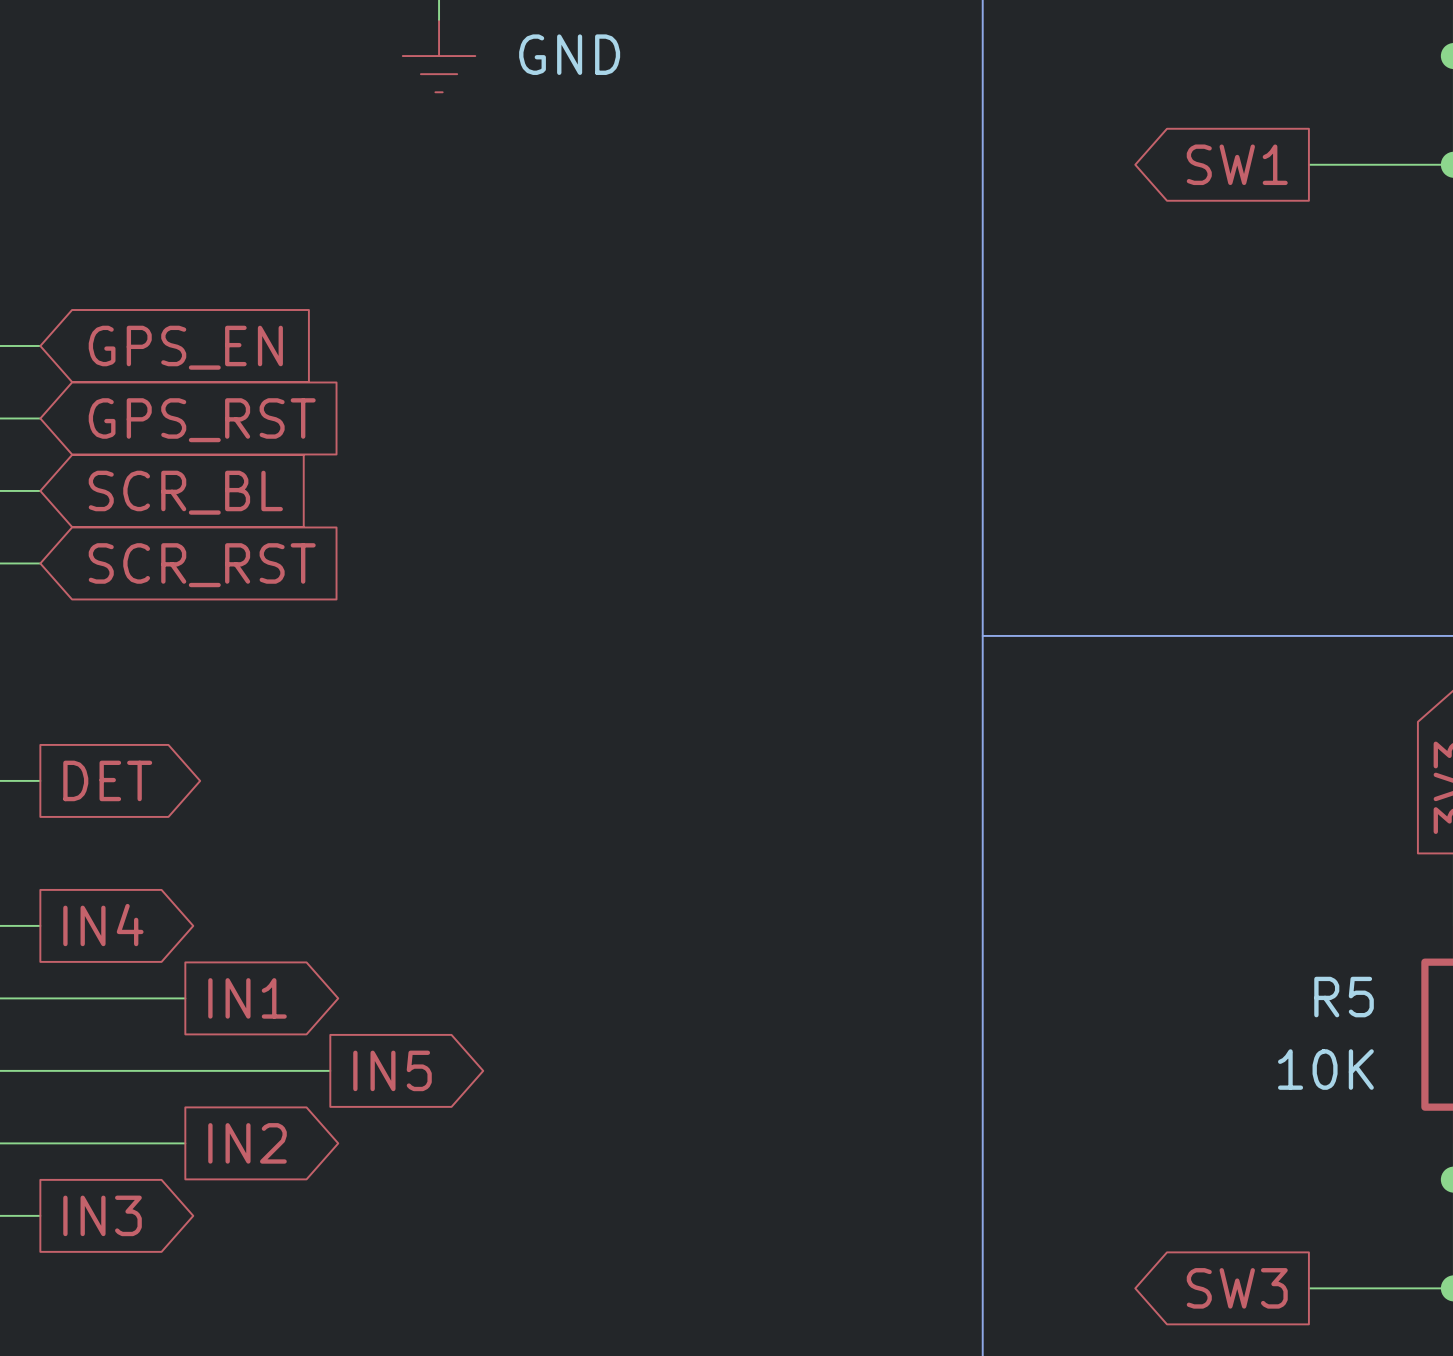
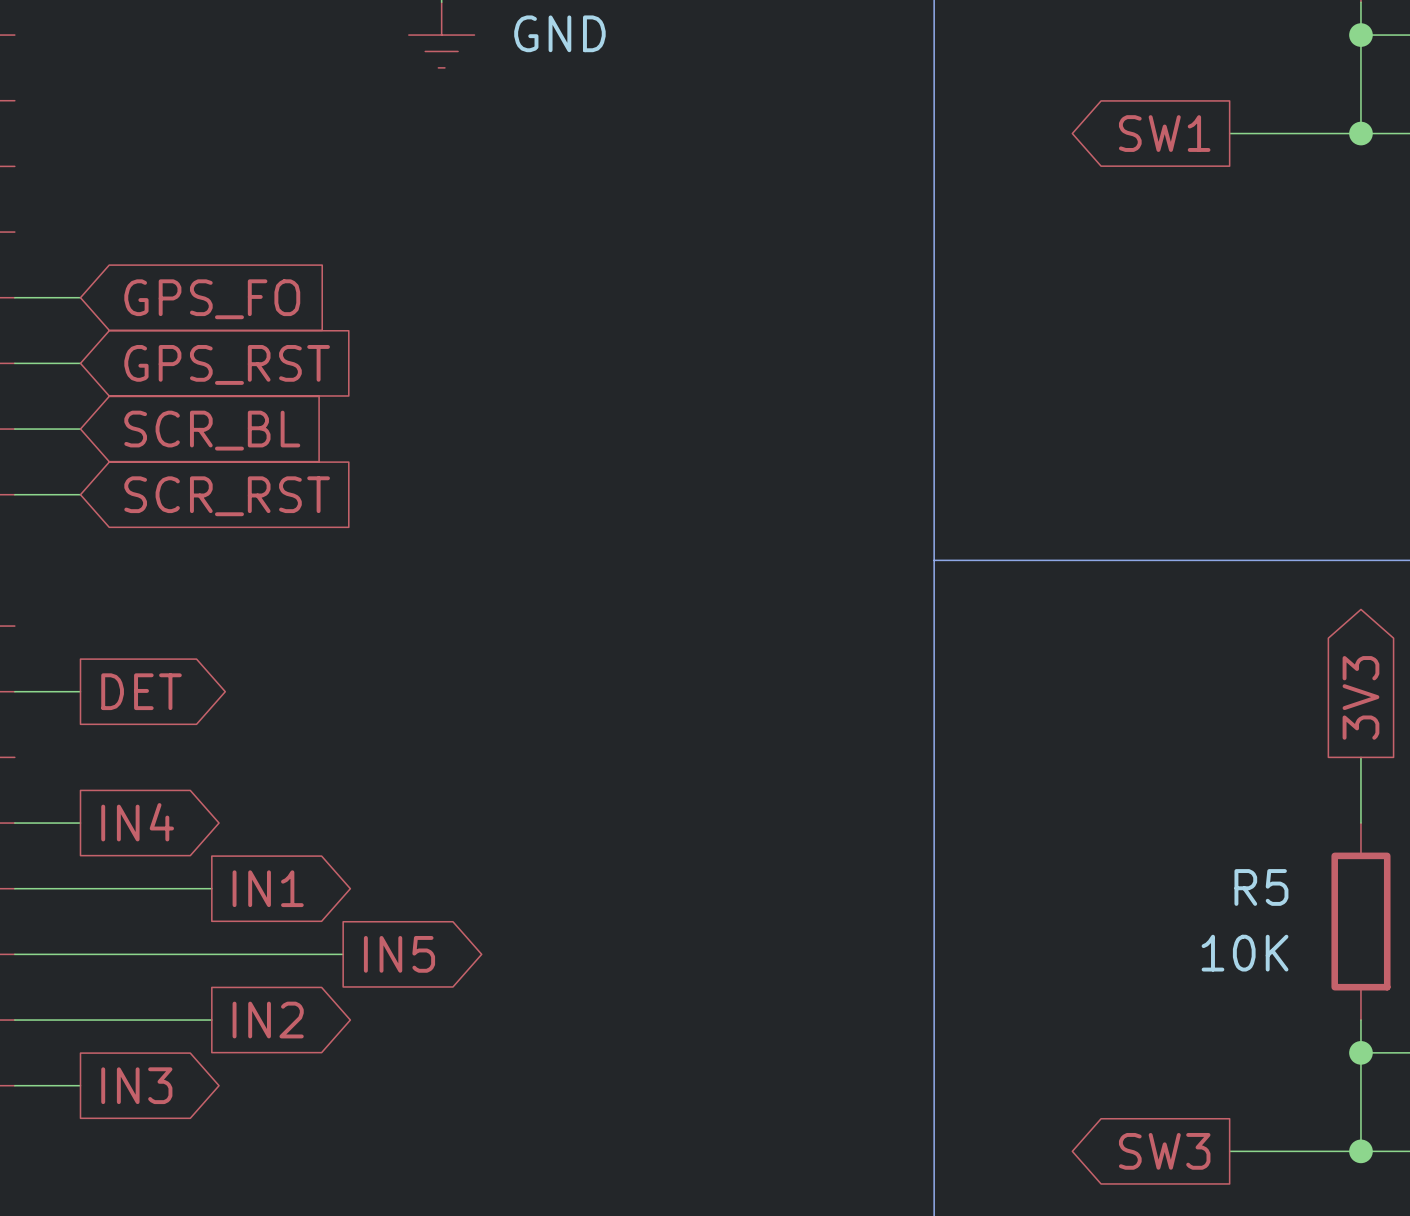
global label: GPS_EN (185, 347) -> GPS_FO (212, 299)

